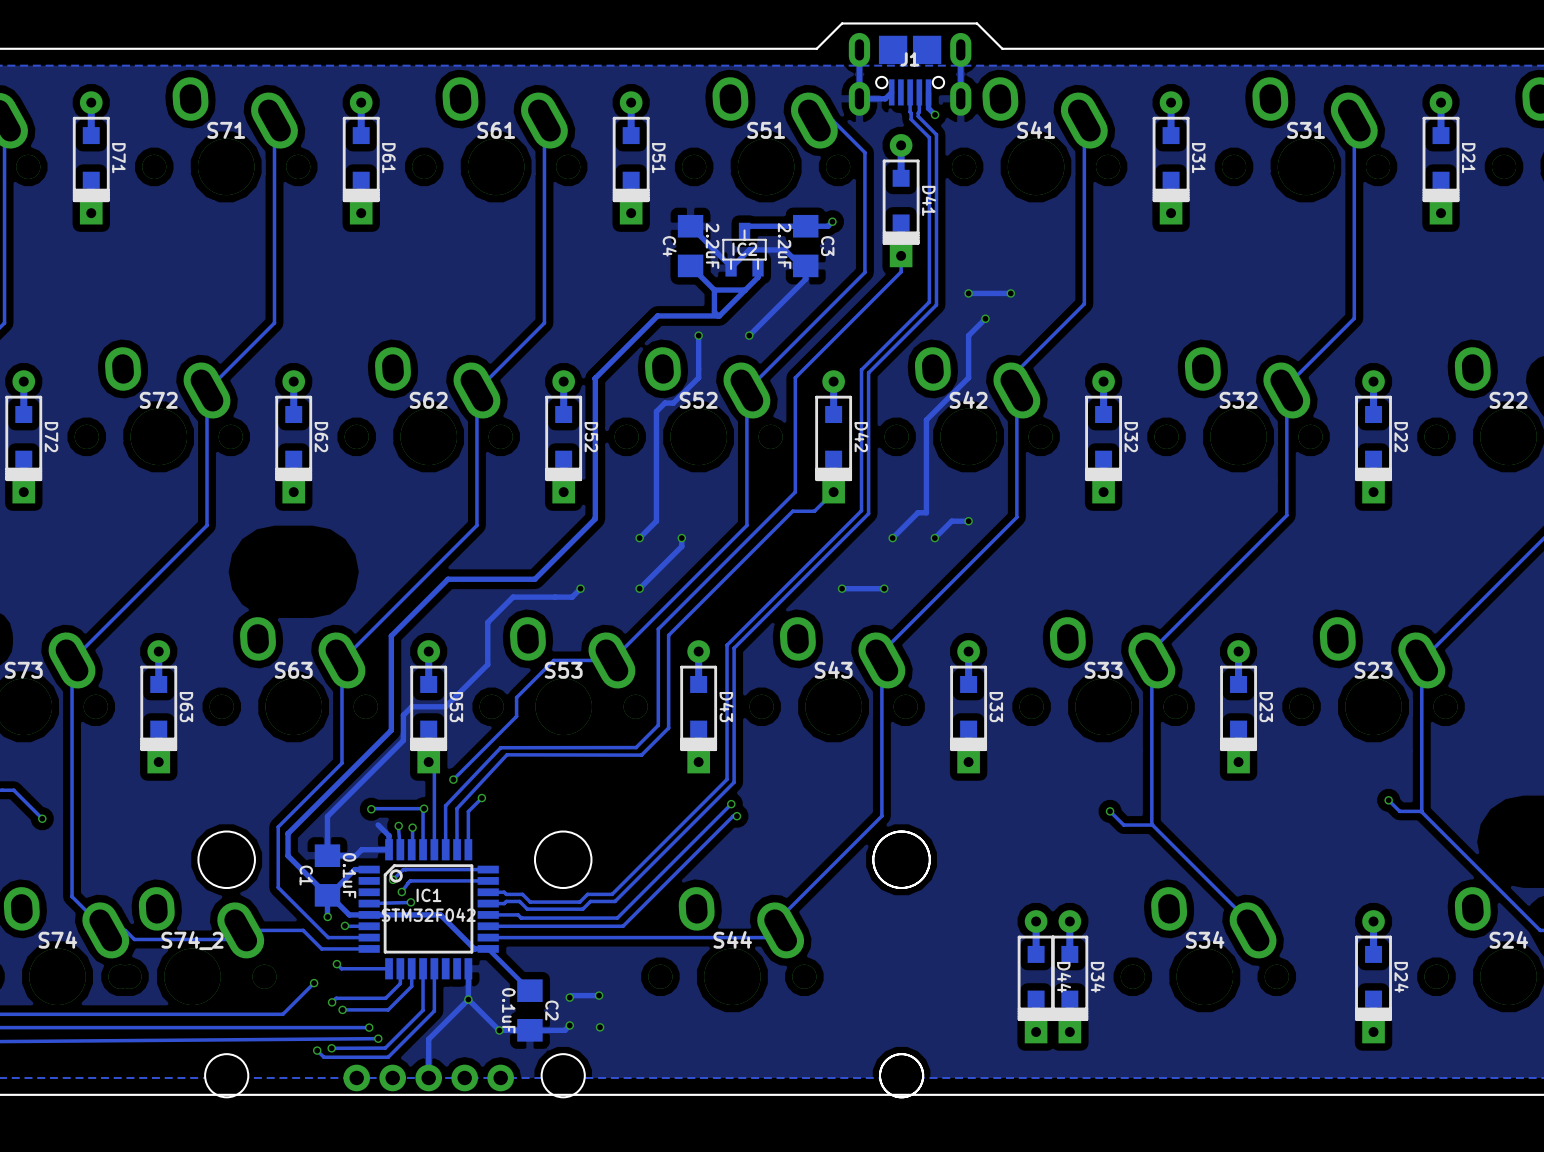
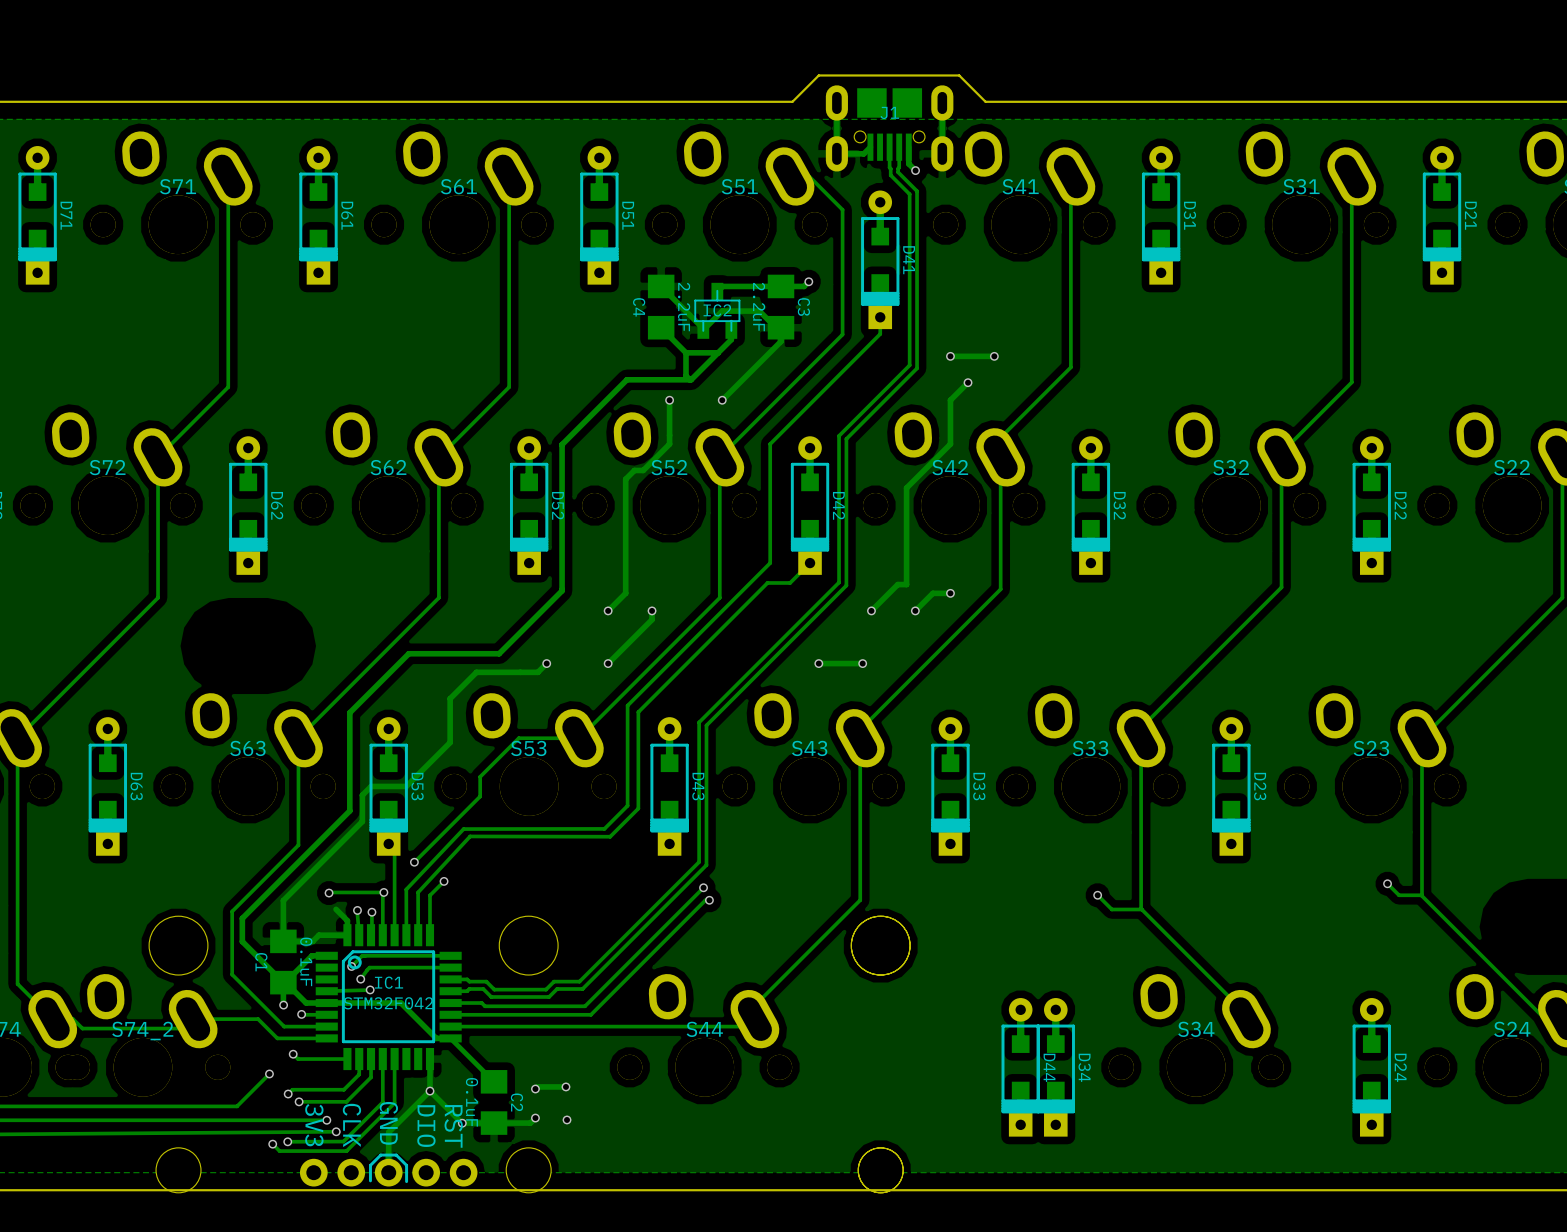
text: none -> GND (388, 1123)
text: none -> 3V3 (314, 1125)
text: none -> CLK (351, 1125)
text: none -> DIO (426, 1126)
text: none -> RST (453, 1126)
line: none -> (370, 1180) (370, 1165) (380, 1155) (396, 1155) (406, 1165) (406, 1181)

